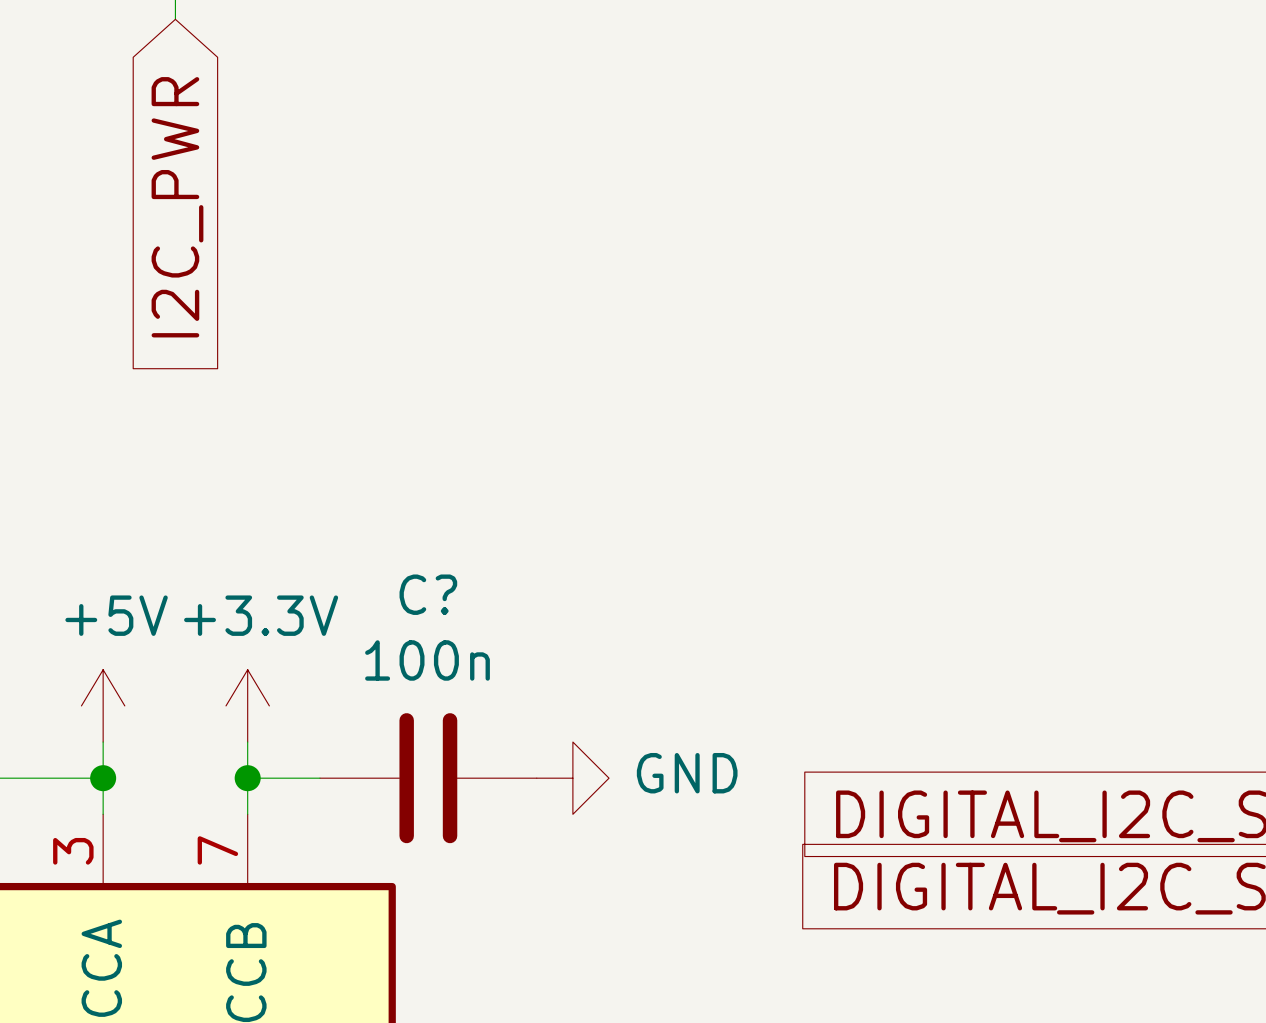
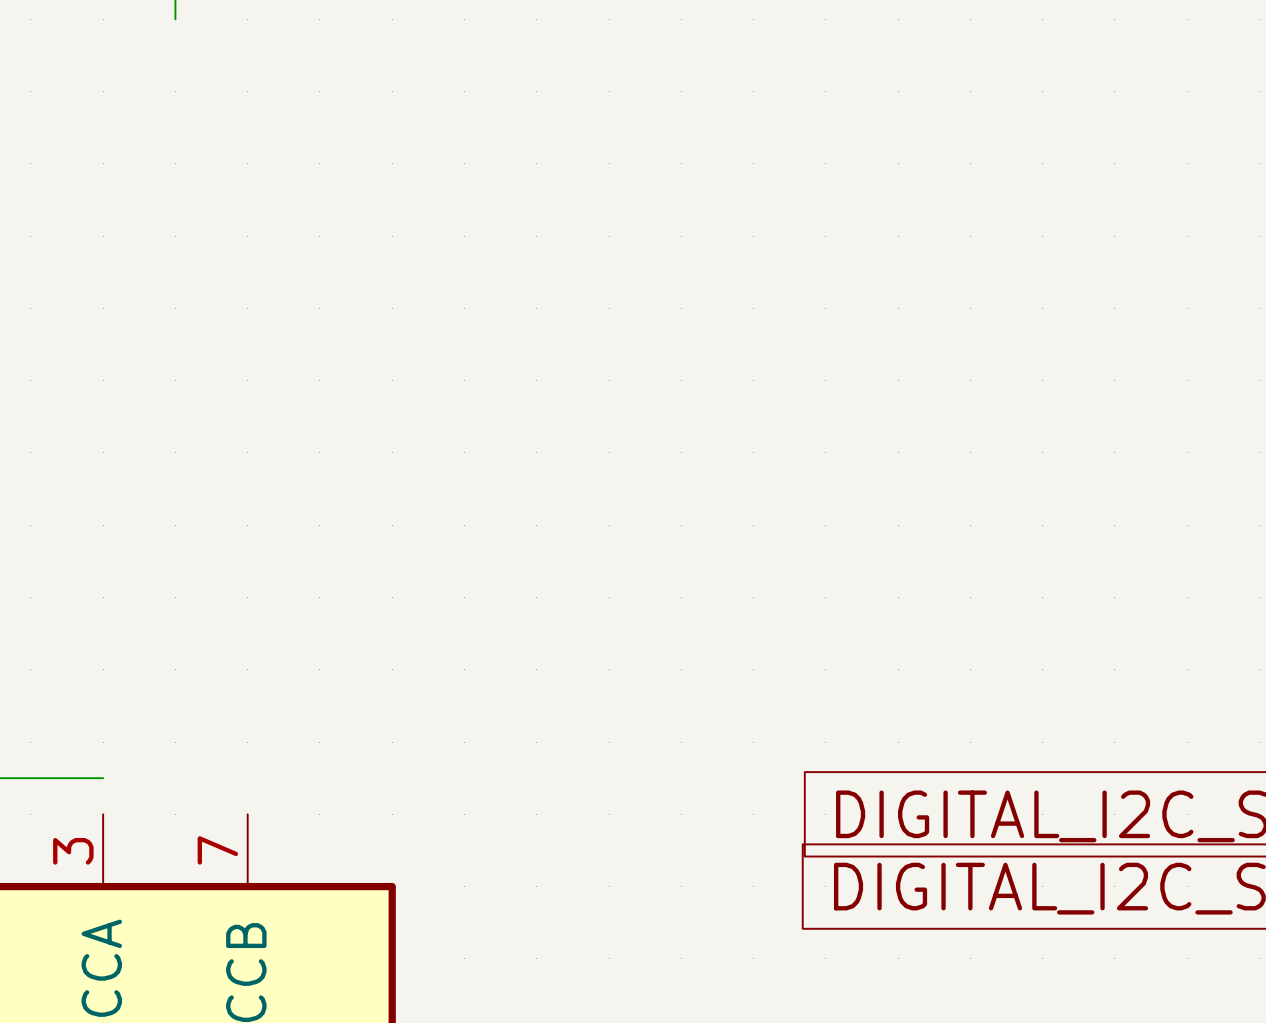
global label: I2C_PWR (177, 207) -> none
power symbol: +5V (103, 705) -> none
power symbol: +3.3V (247, 705) -> none
wire: (103, 742) (103, 814) -> none
wire: (247, 742) (247, 814) -> none
junction: (103, 778) -> none
wire: (247, 778) (319, 778) -> none
junction: (247, 778) -> none
C?: 100n (428, 778) -> none
power symbol: GND (572, 778) -> none

